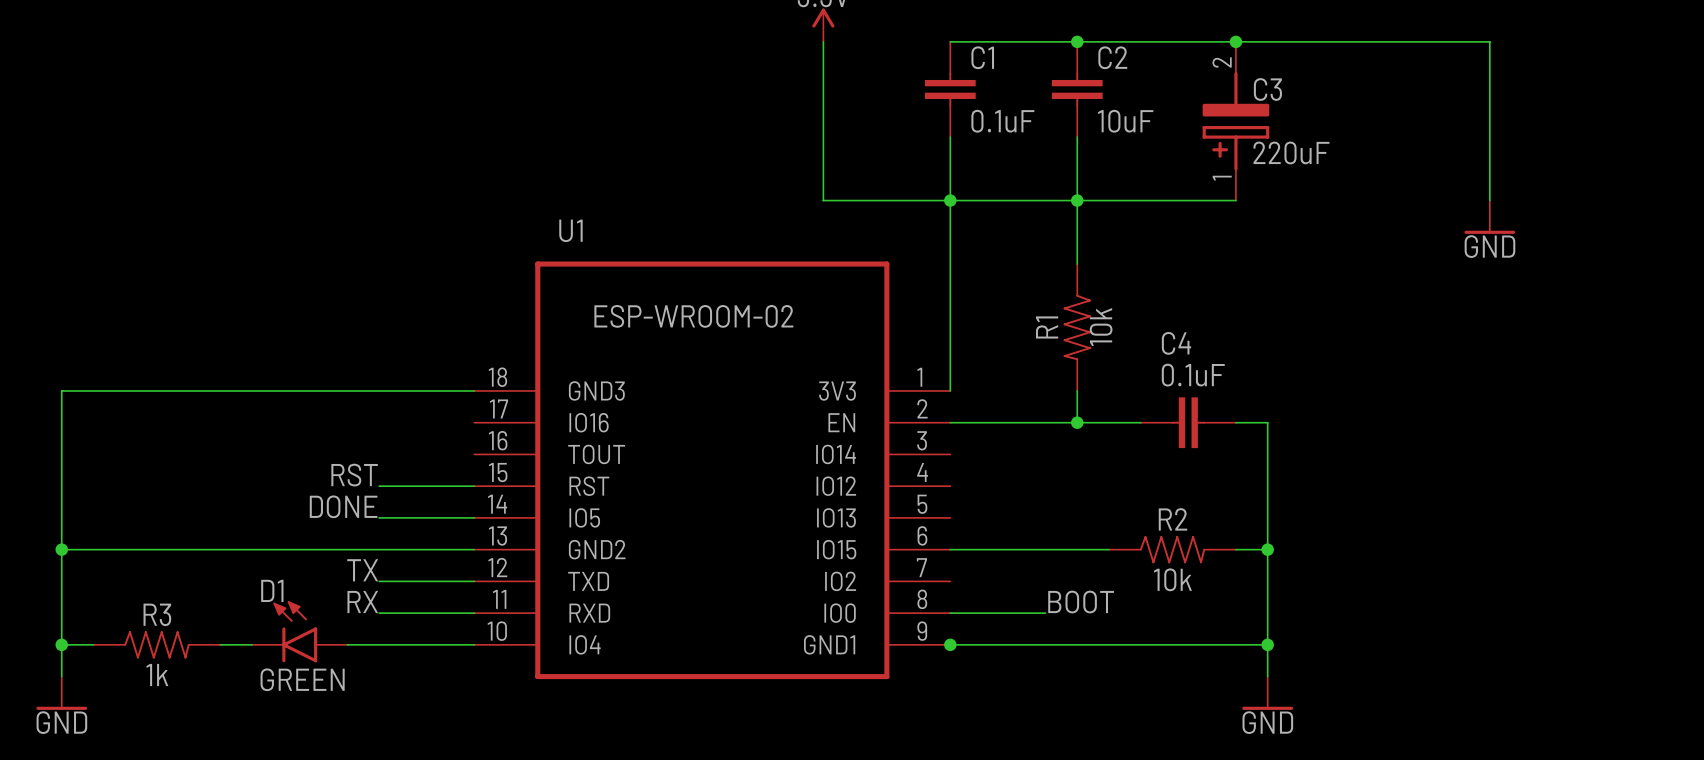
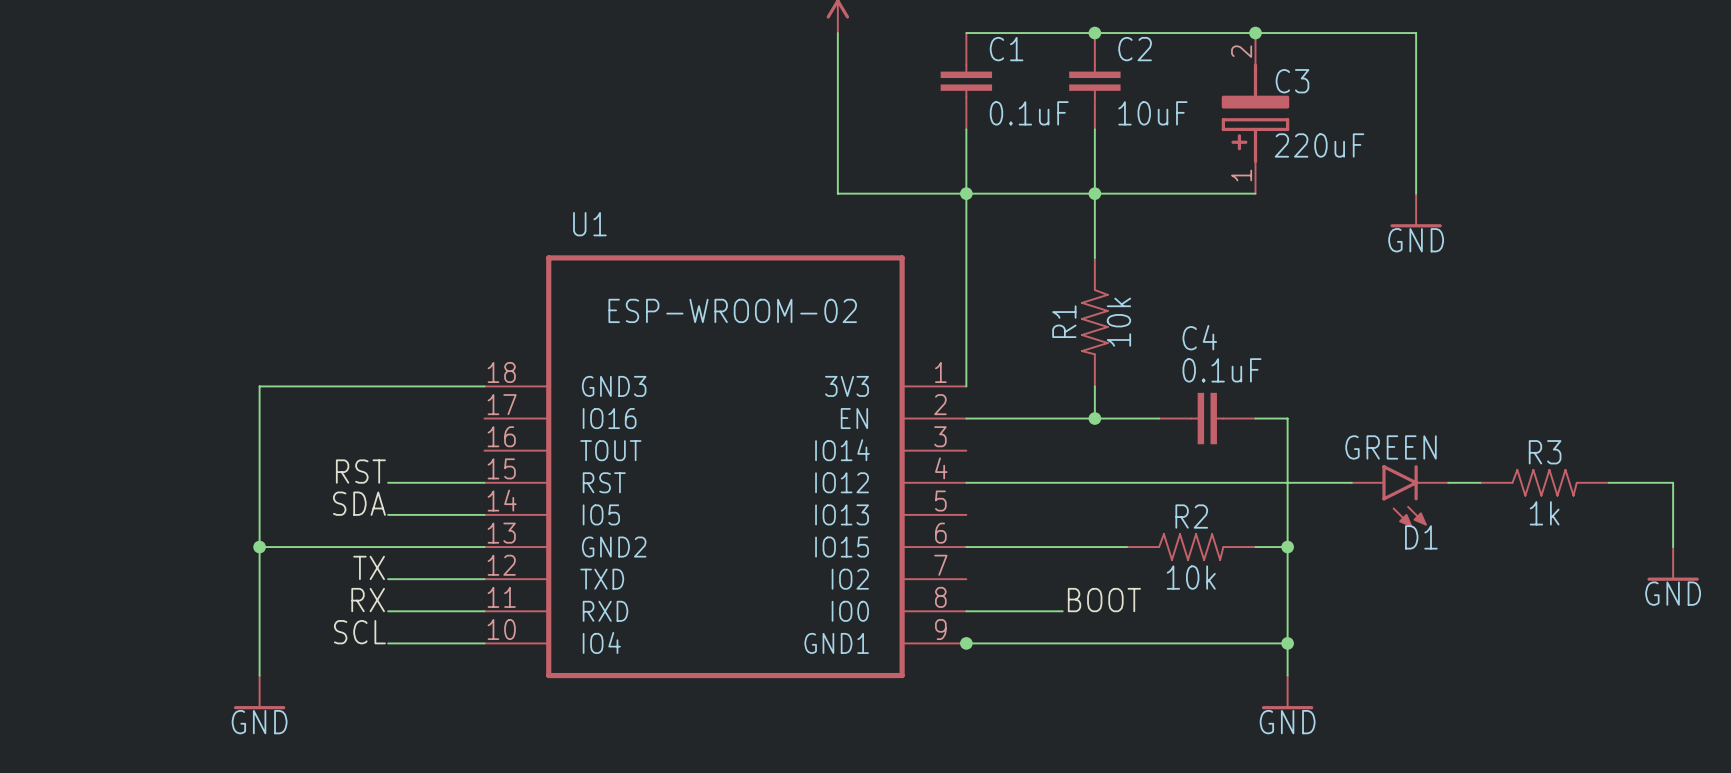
wire: (1394, 41) (1489, 41) (1489, 200) -> (1416, 33) (1416, 193)
power symbol position: GND (1489, 217) -> GND (1416, 210)
wire: (252, 390) (61, 390) (61, 676) -> (259, 386) (259, 675)
wire: none -> (966, 482) (1351, 482)
wire: none -> (1448, 482) (1480, 482)
wire: none -> (1608, 482) (1673, 482) (1673, 547)
label: DONE (343, 506) -> SDA (359, 503)
wire: (61, 549) (252, 549) -> none
junction: (61, 549) -> none
junction: none -> (259, 547)
power symbol: none -> GND (1673, 563)
D1 rotation: 0° (295, 631) -> 180° (1404, 496)
D1 position: (299, 631) -> (1400, 496)
label: none -> SCL (359, 632)
wire: (61, 644) (93, 644) -> none
junction: (61, 644) -> none
R3 position: (156, 644) -> (1544, 482)
wire: (220, 644) (252, 644) -> none
wire: (347, 644) (379, 644) -> none
power symbol position: GND (61, 693) -> GND (259, 692)

